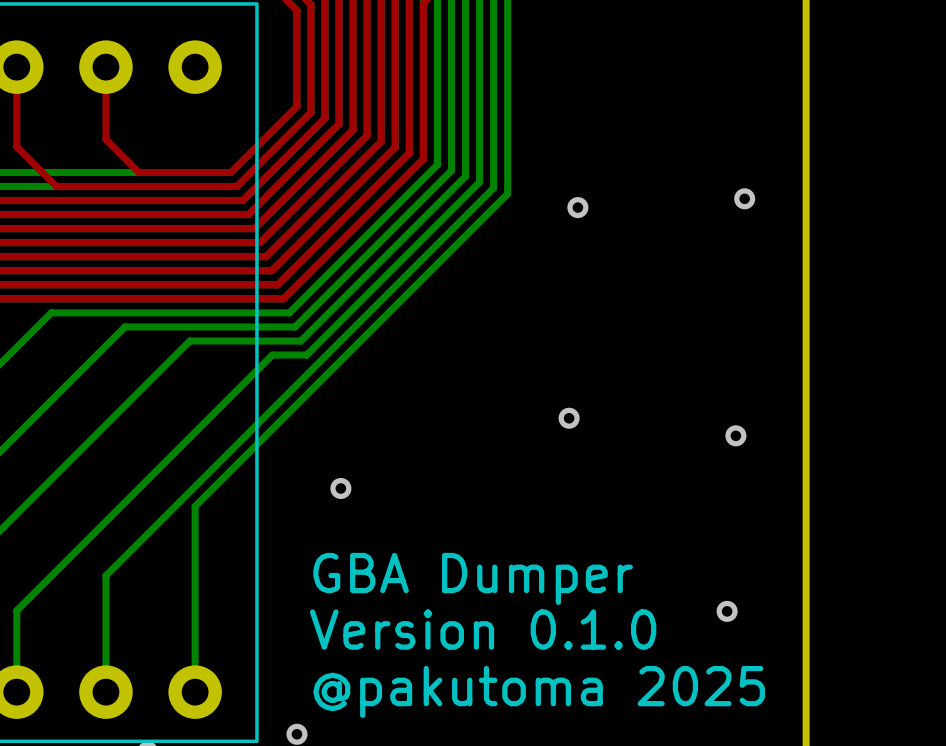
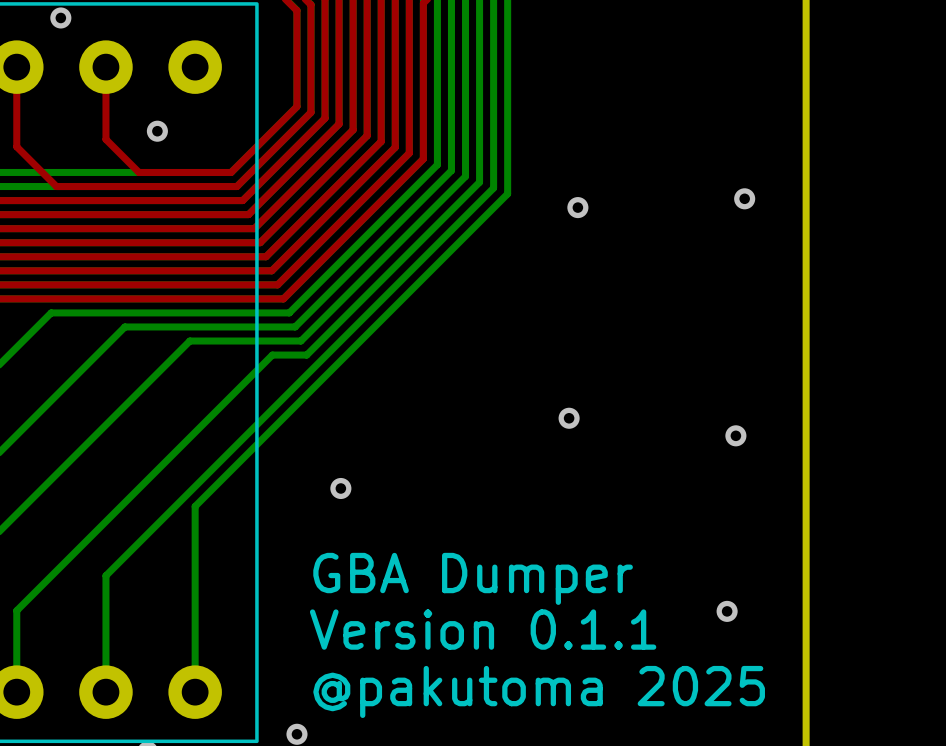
via: none -> (60, 17)
via: none -> (157, 131)
text: Version 0.1.0 (483, 629) -> Version 0.1.1 (483, 629)

